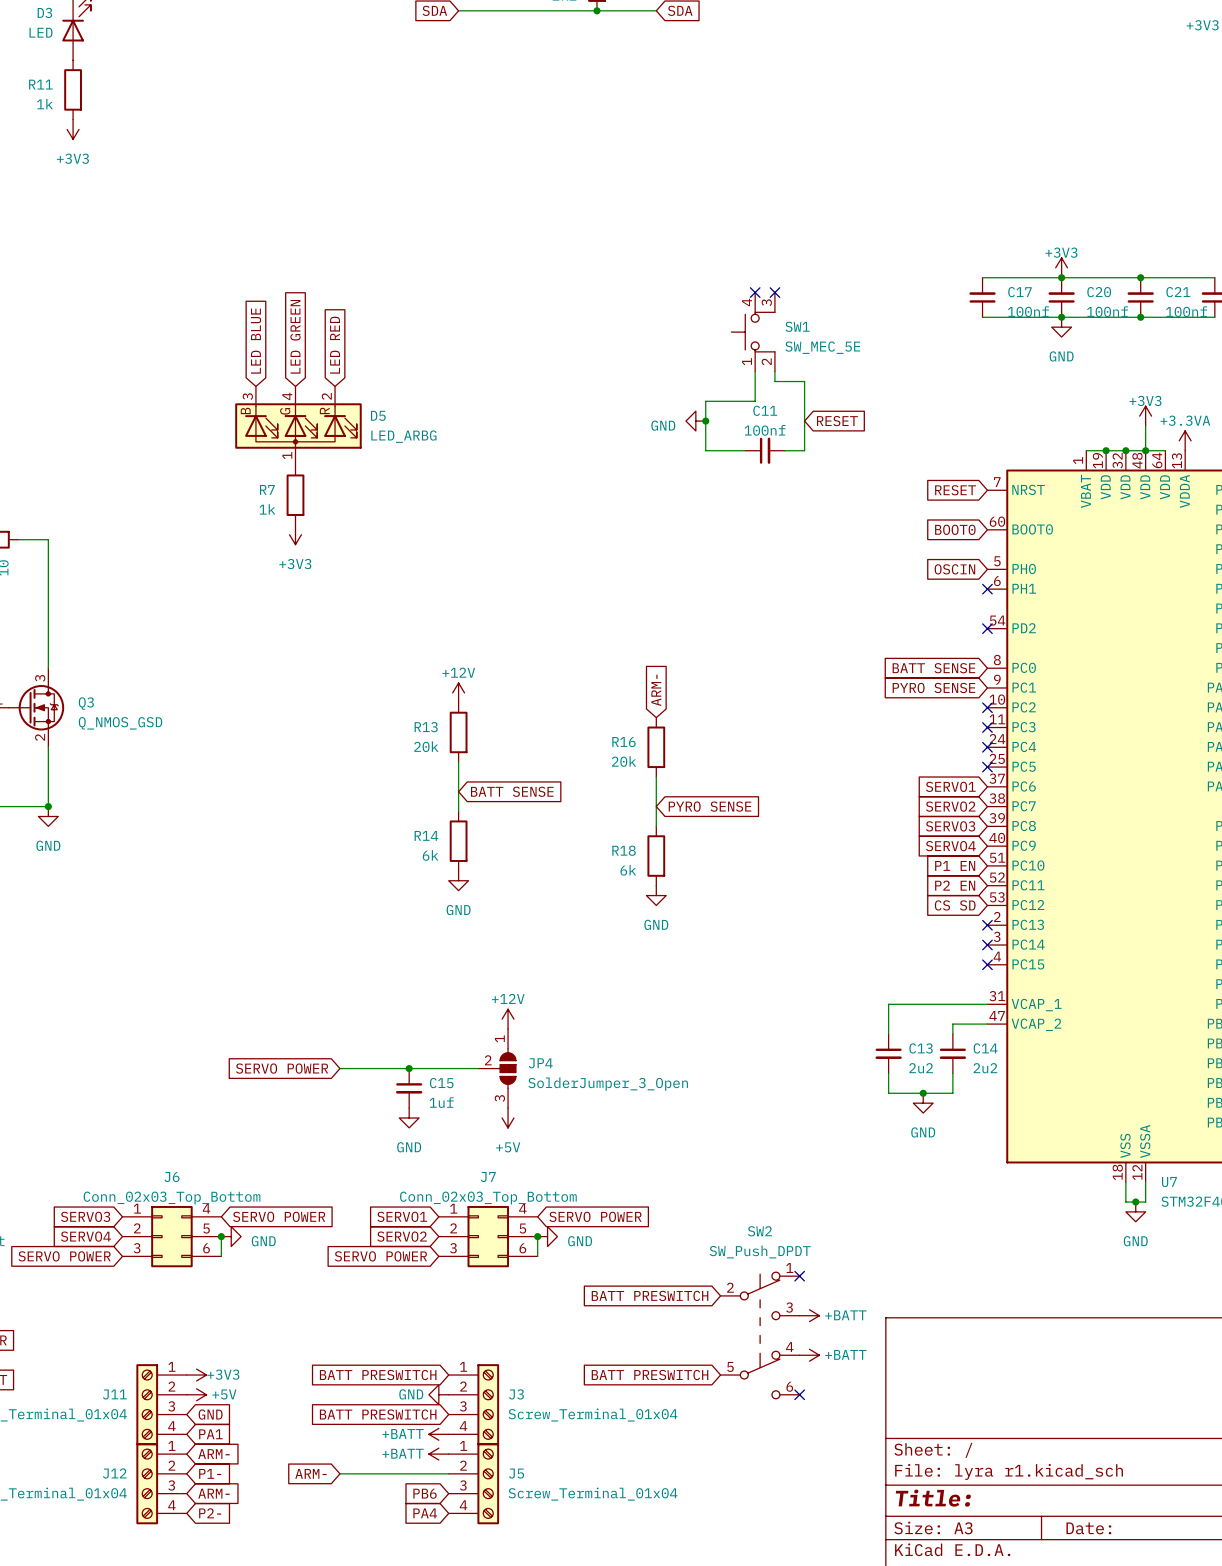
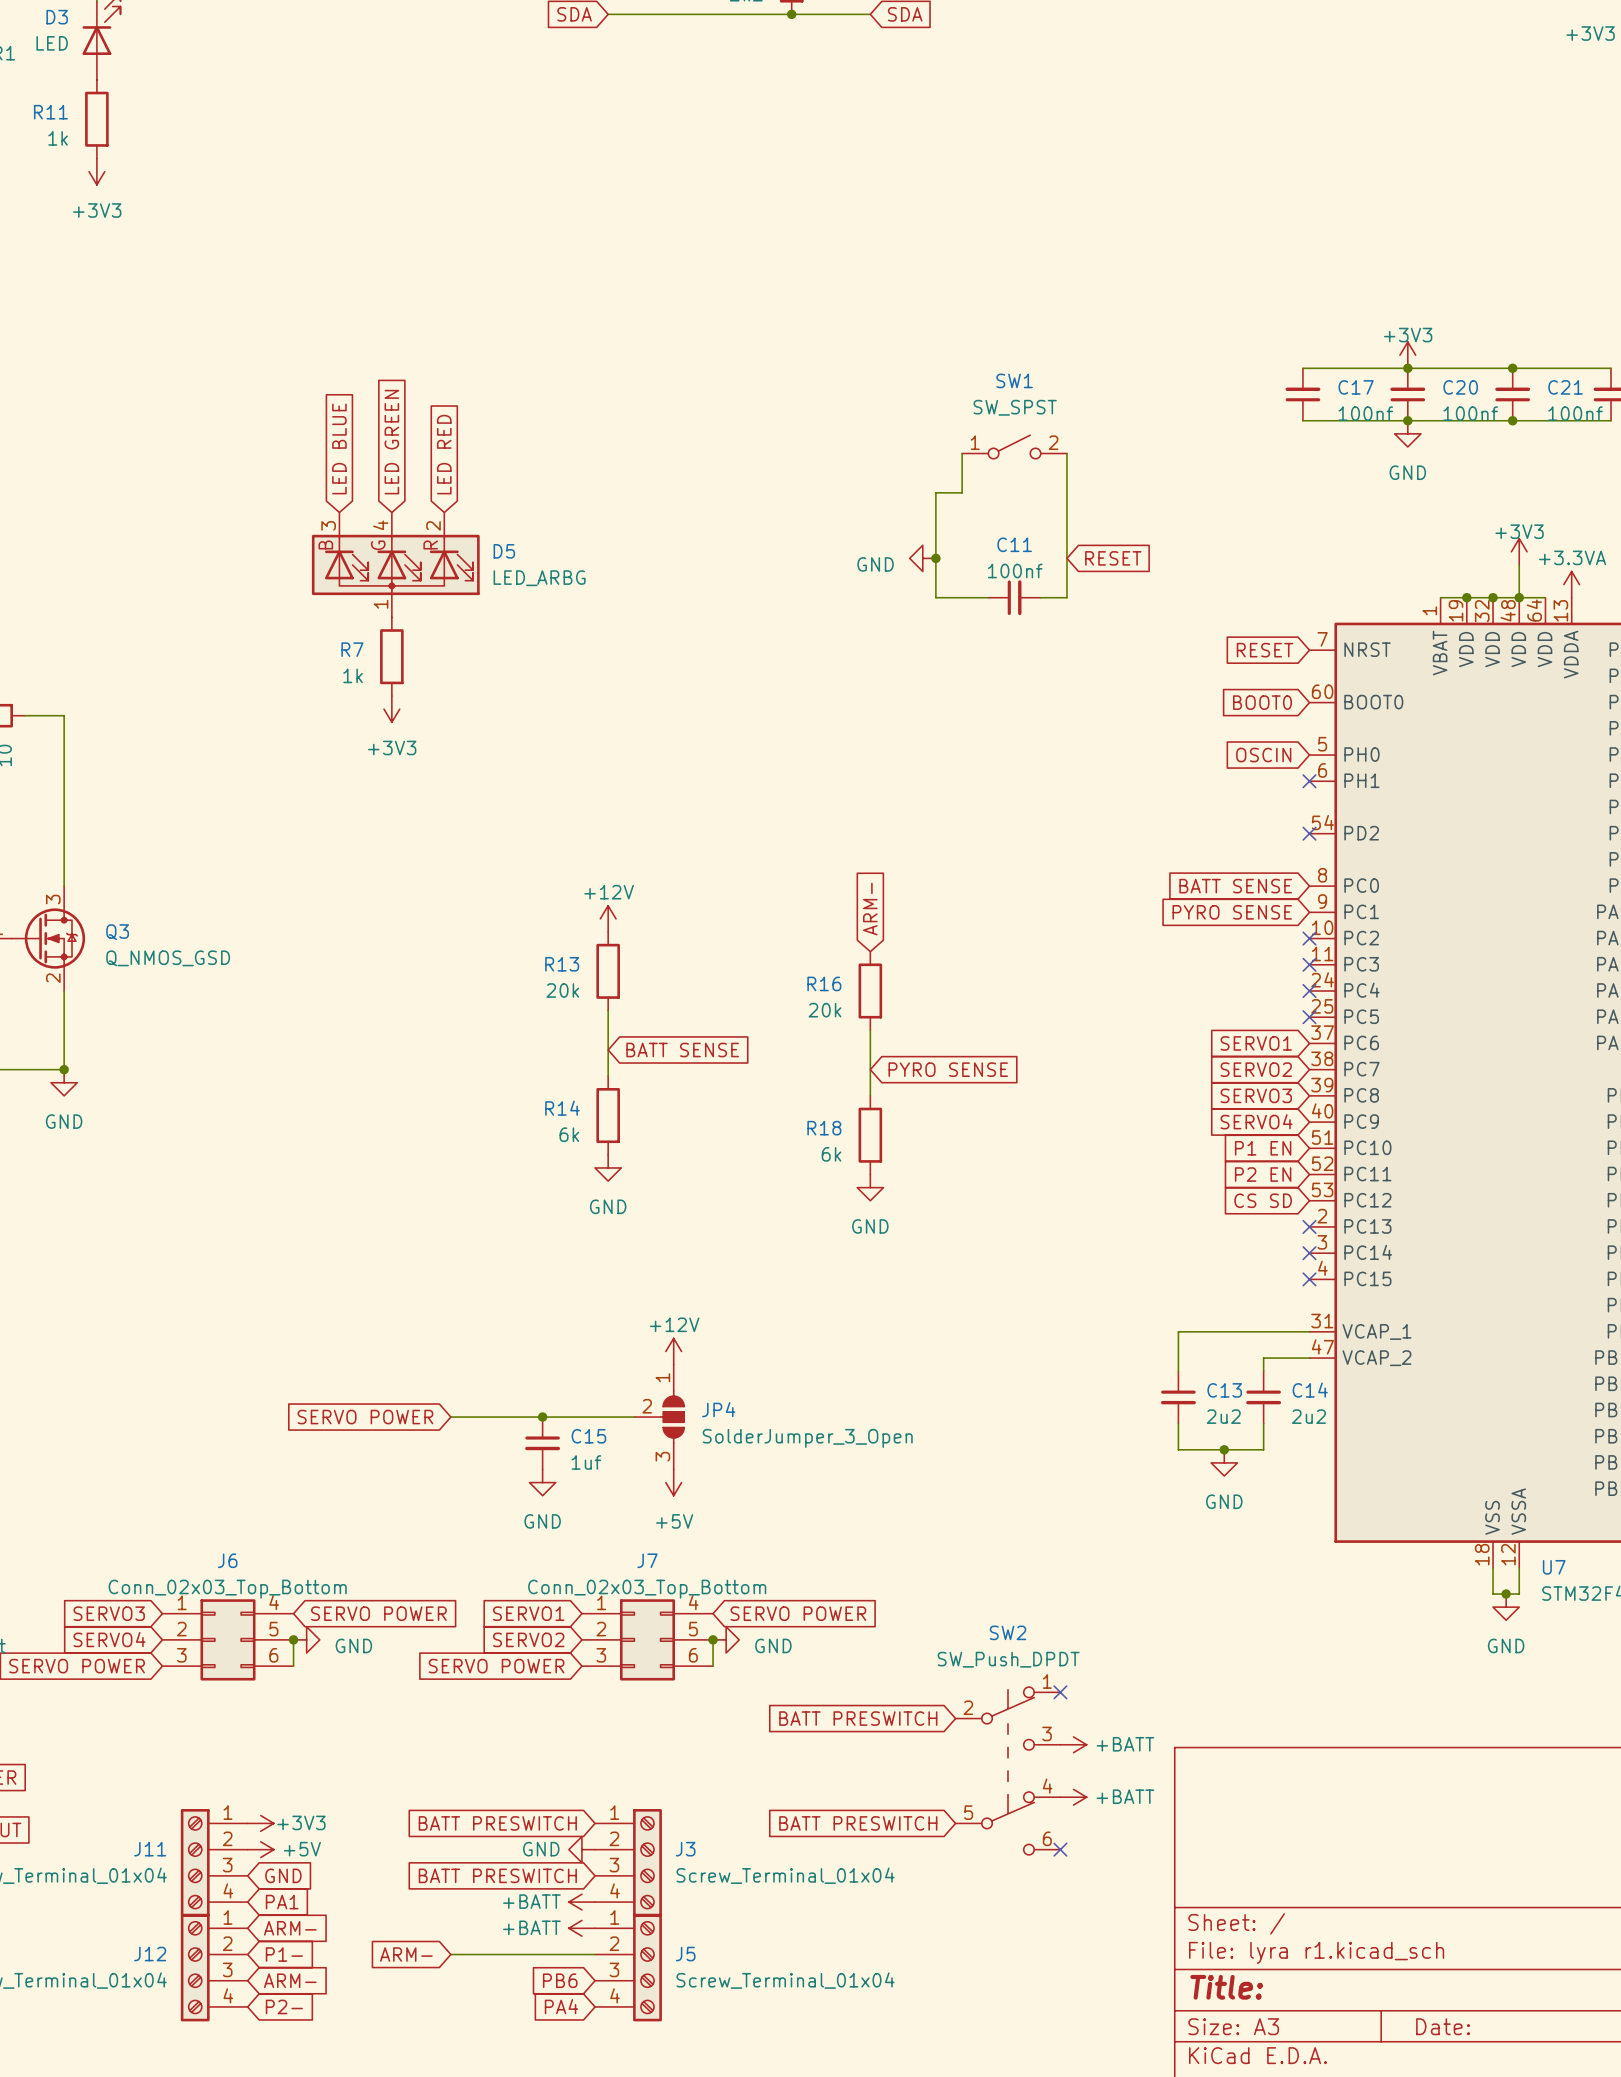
SW1 symbol: [731, 292, 775, 372] -> [962, 435, 1067, 459]
no-connect mark: (755, 292) -> none
no-connect mark: (774, 292) -> none
SW1 name position: SW1 (797, 326) -> SW1 (1014, 380)
SW1 value: SW_MEC_5E (822, 347) -> SW_SPST (1015, 407)
wire: (755, 371) (755, 401) (705, 401) -> (962, 453) (962, 492) (935, 492) (935, 532)
wire: (774, 371) (774, 381) (804, 381) -> (1066, 453) (1066, 505)

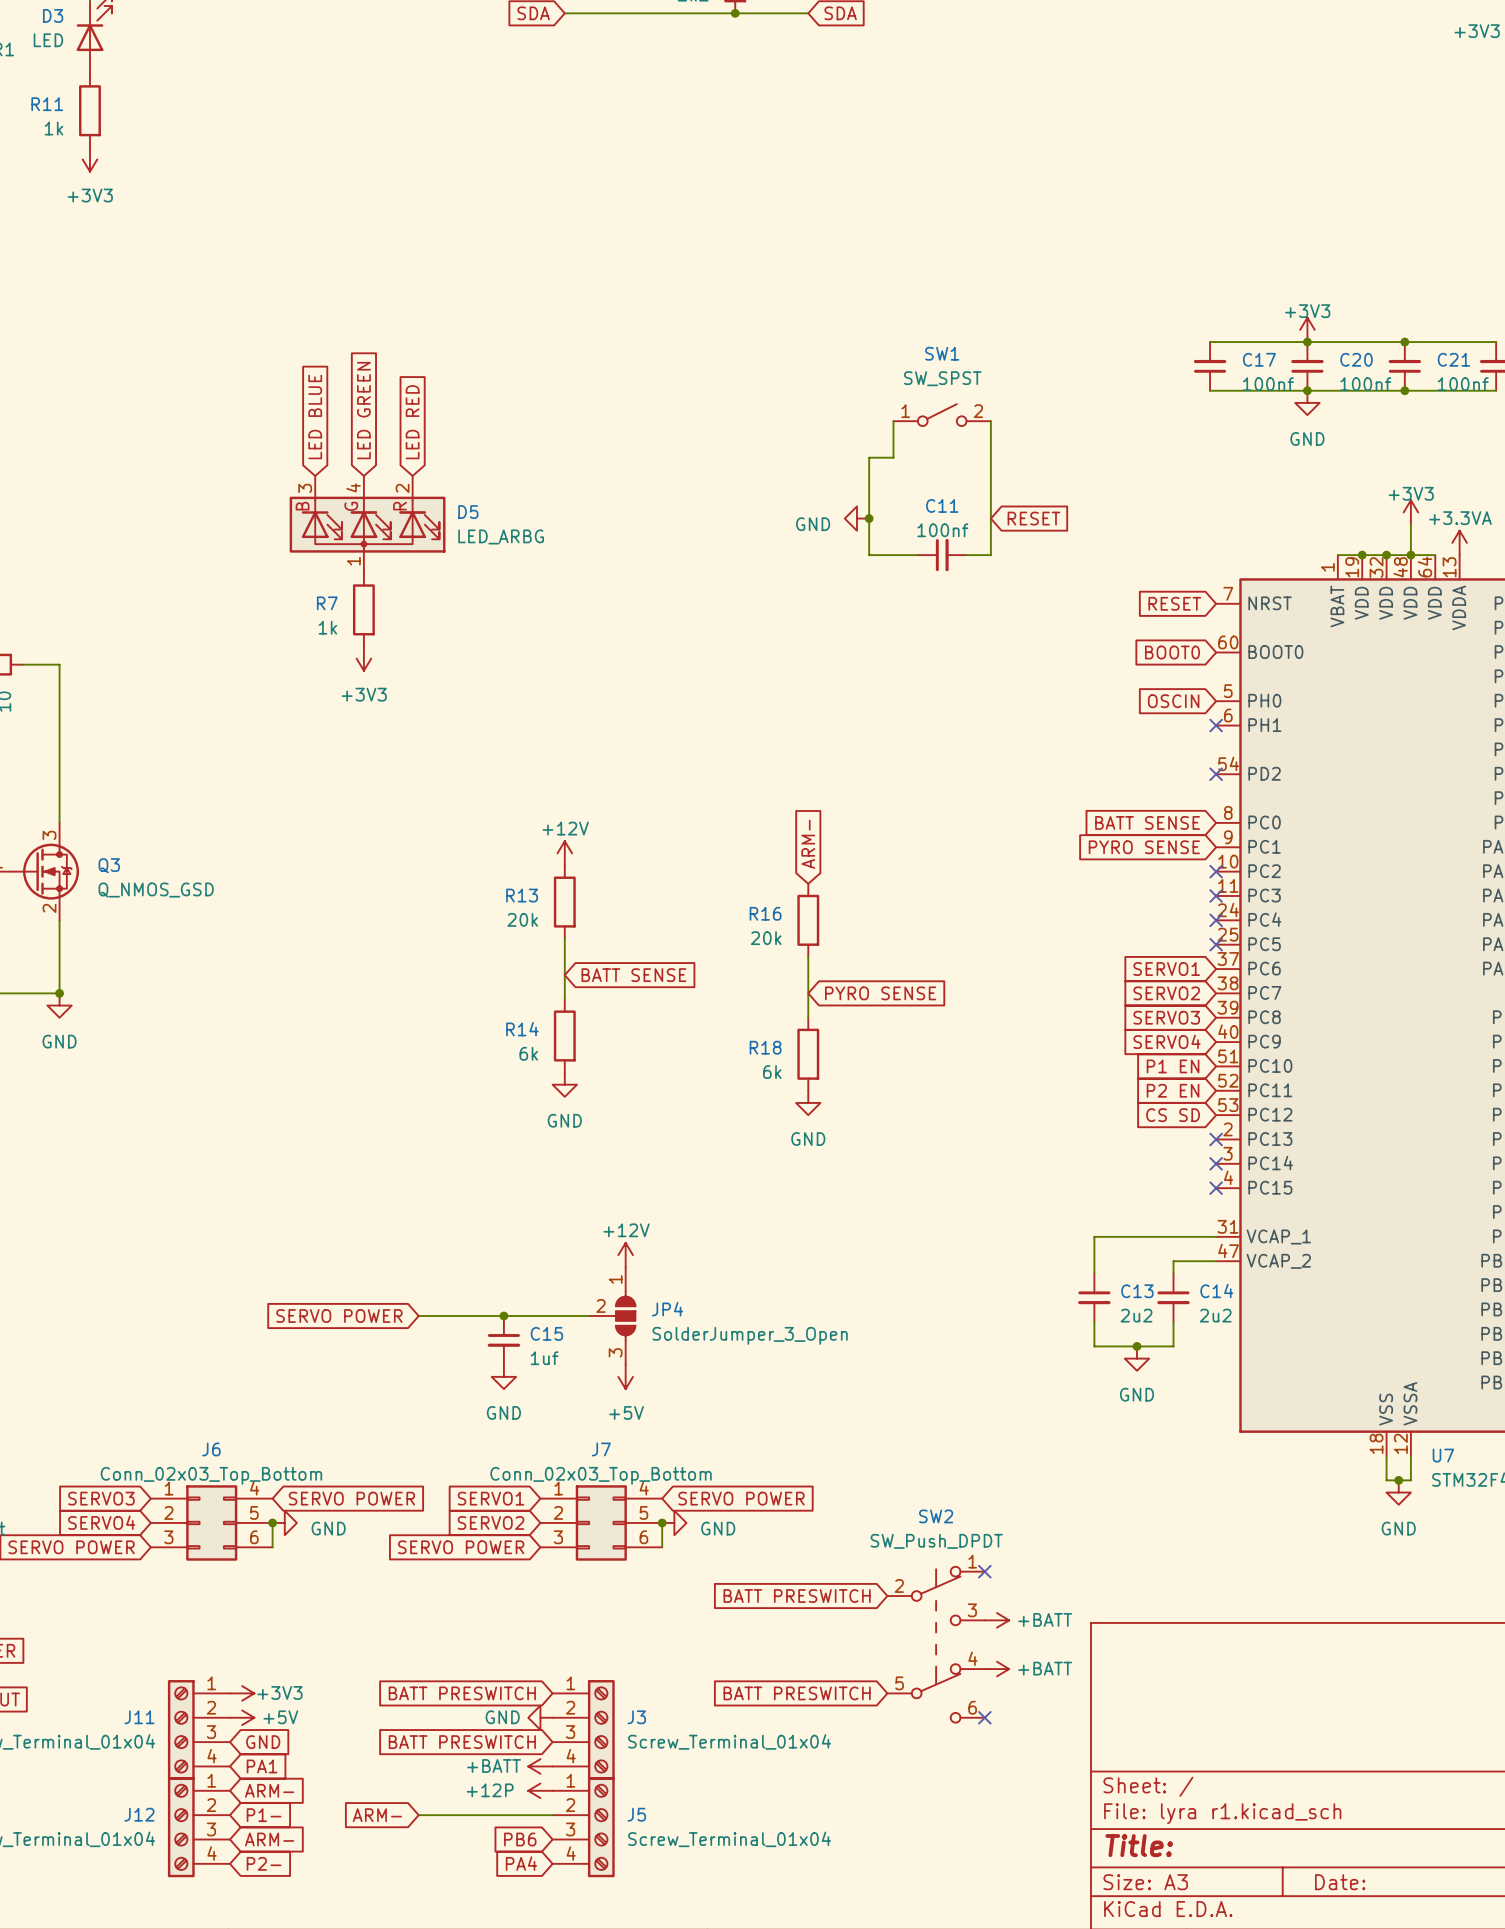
power symbol: +BATT (581, 1928) -> +12P (540, 1790)

